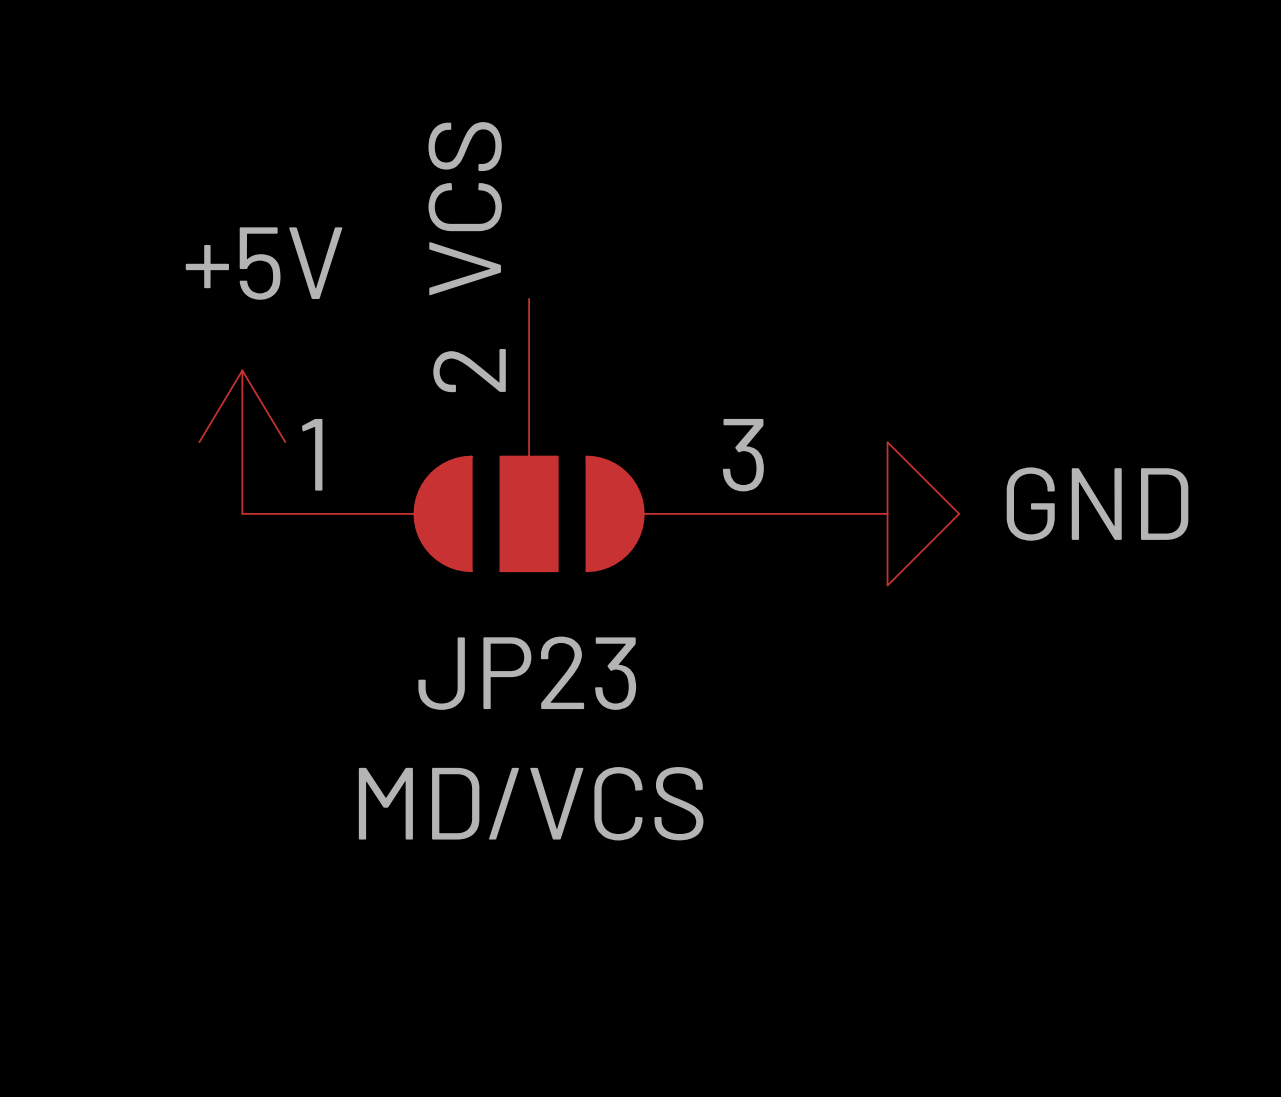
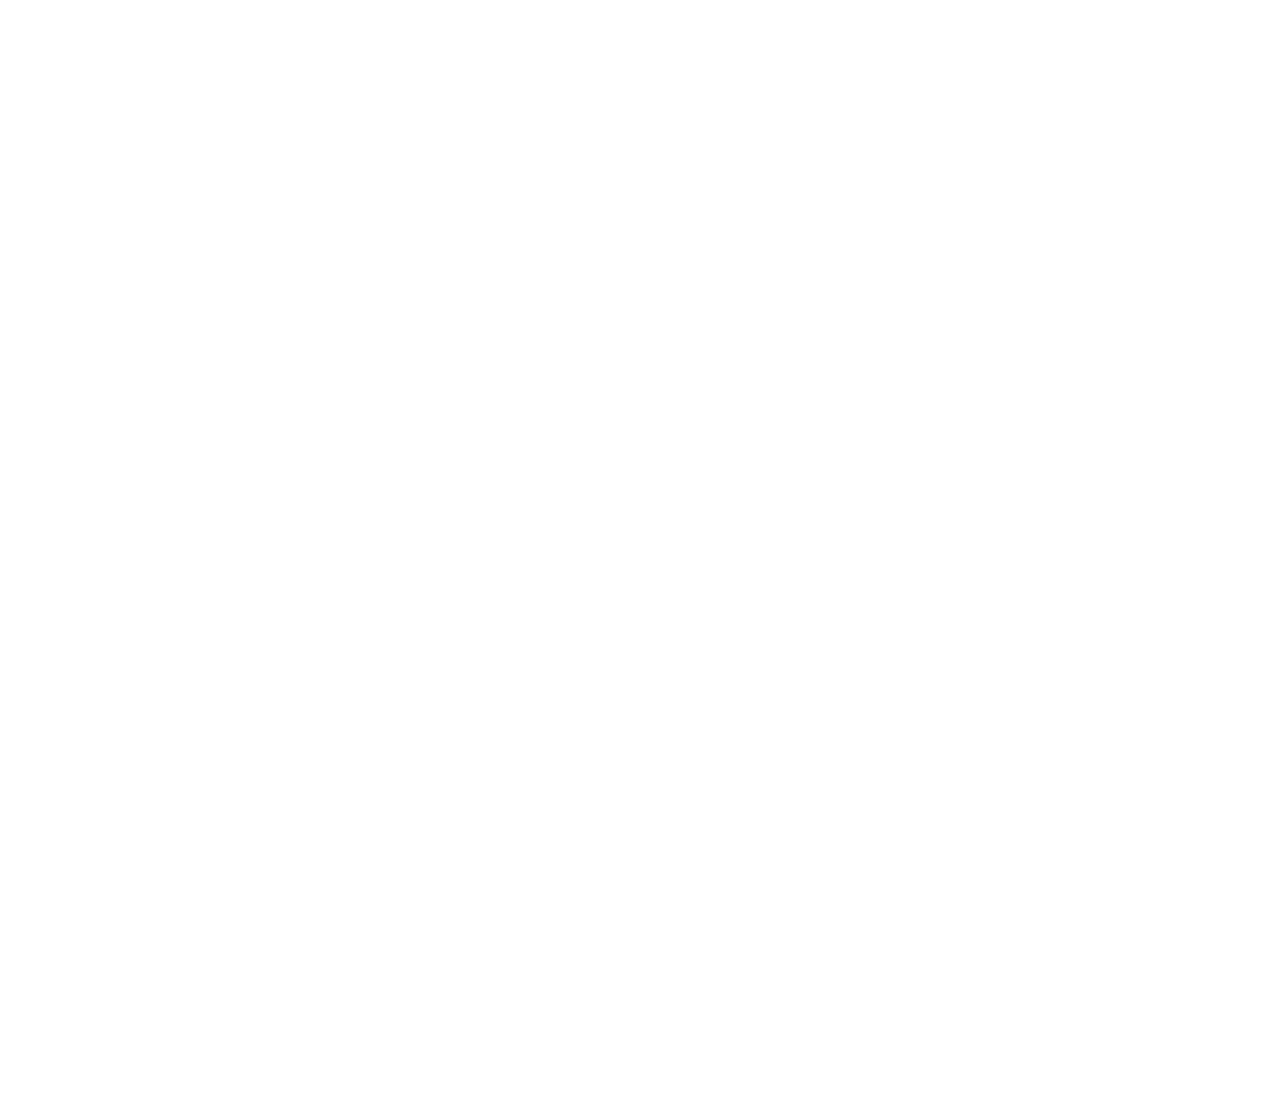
label: VCS (465, 208) -> none
JP23: MD/VCS (529, 435) -> none
power symbol: +5V (242, 442) -> none
power symbol: GND (887, 513) -> none

